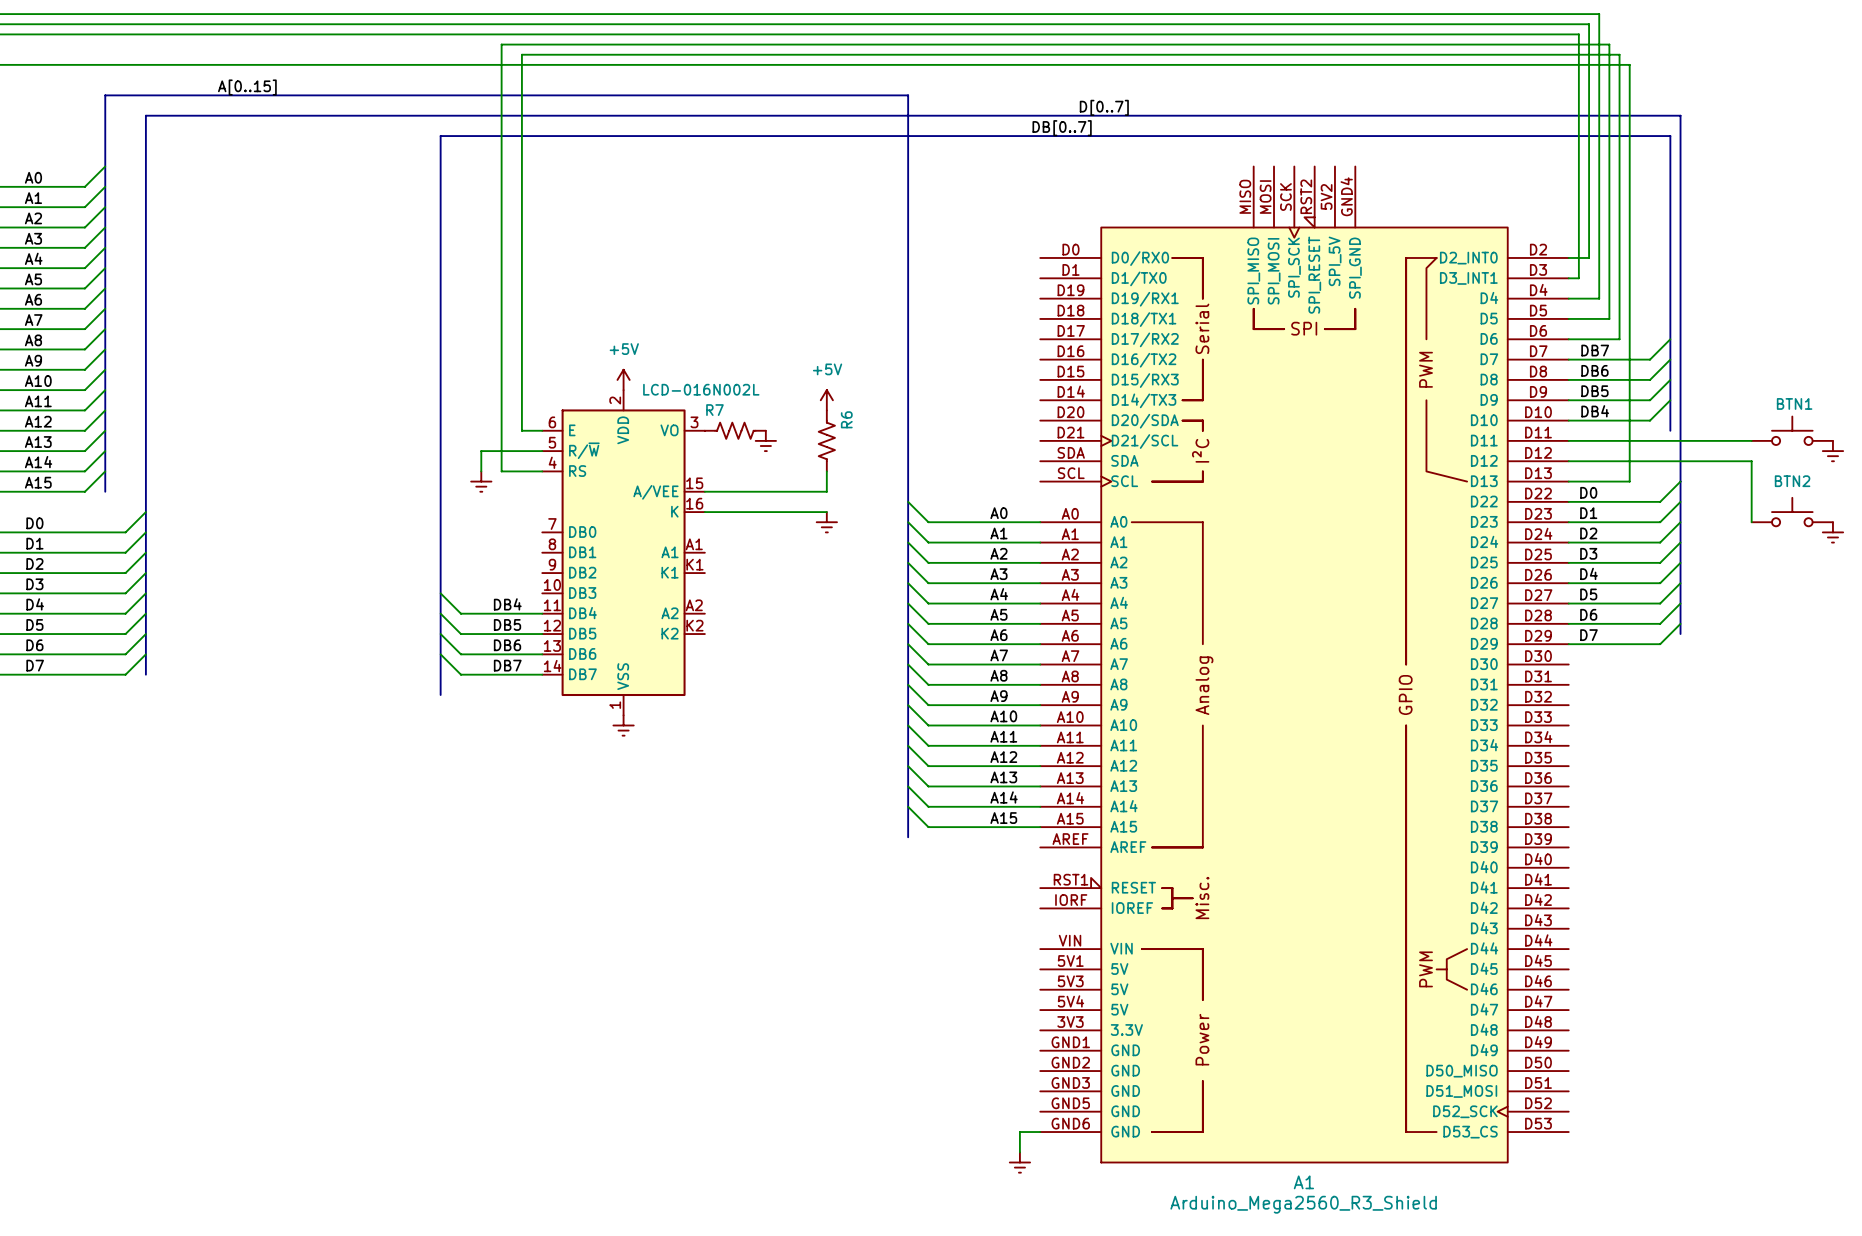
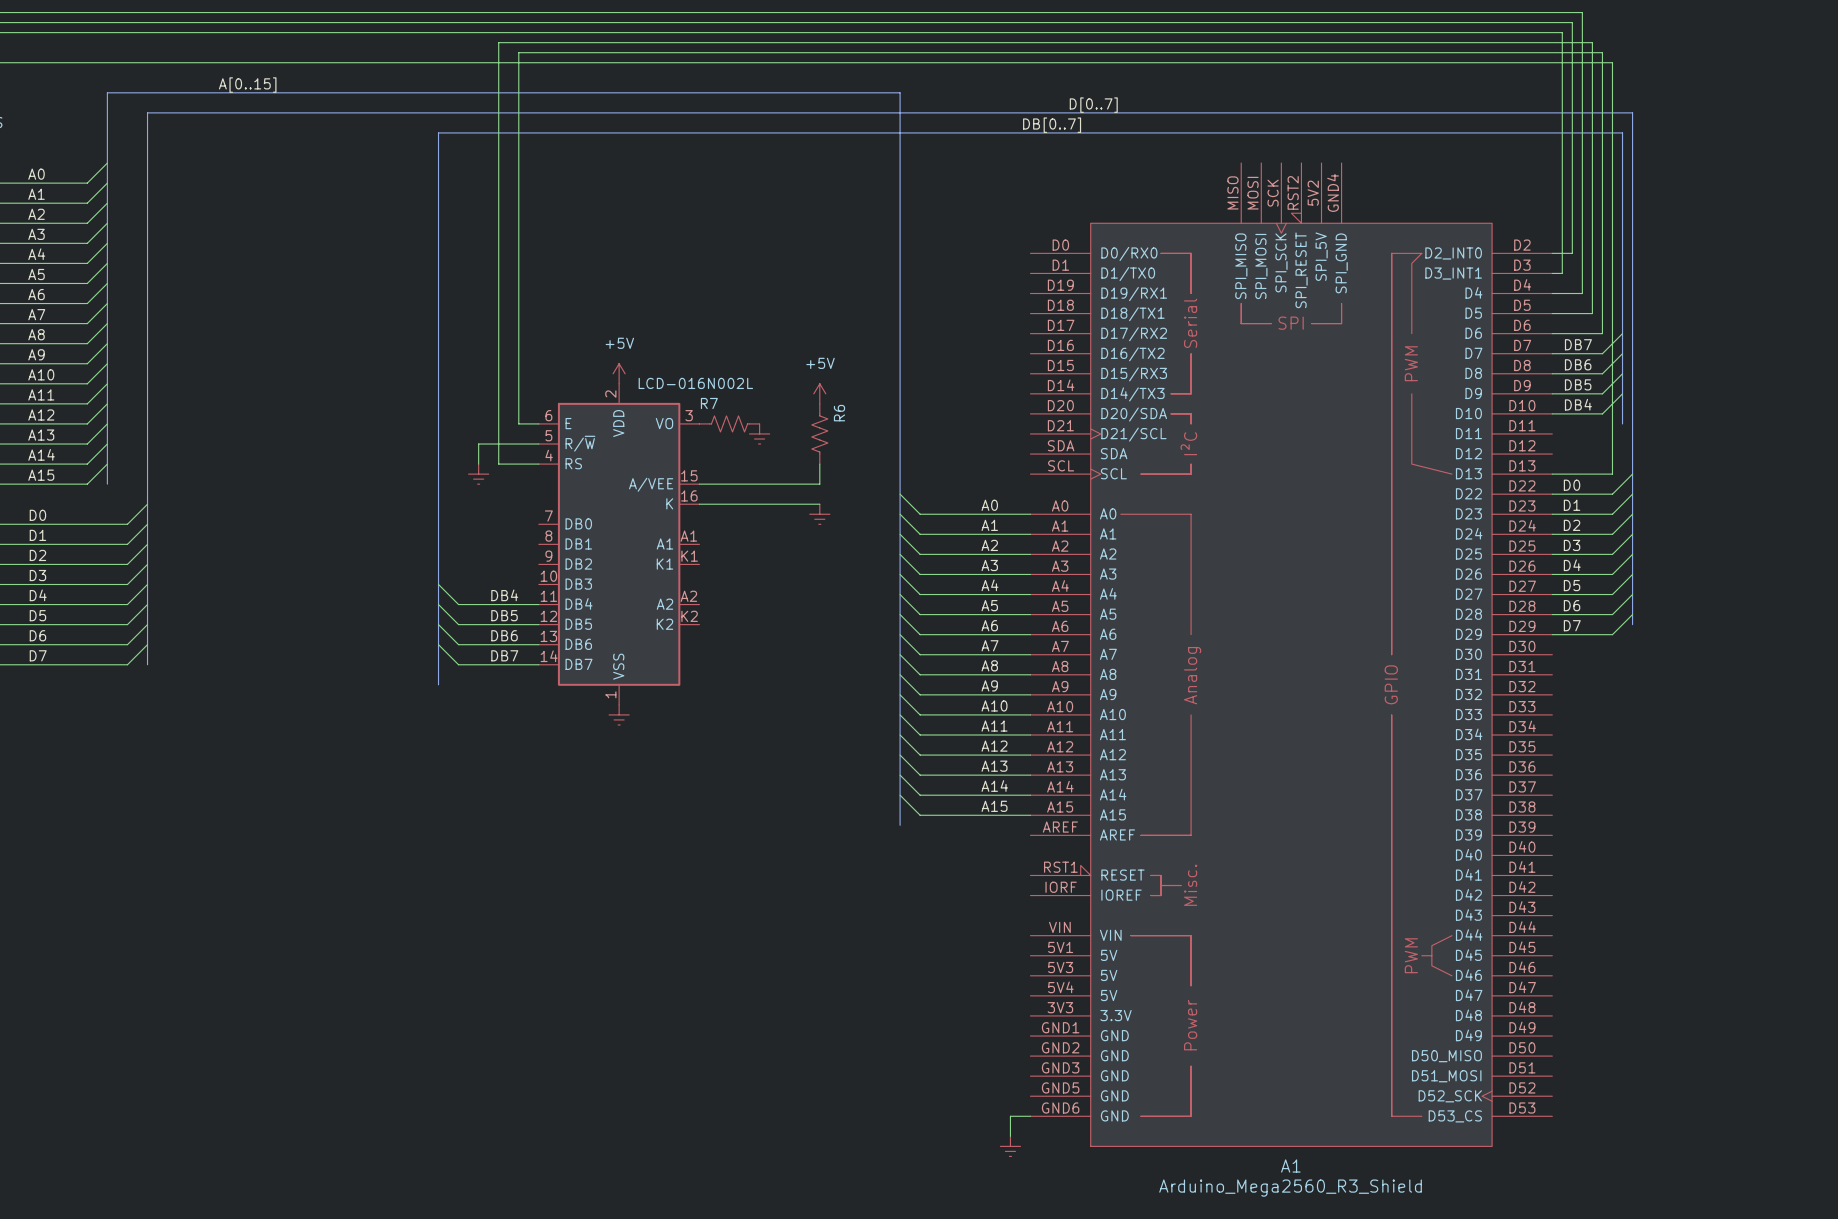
bus: (1650, 115) (1680, 115) (1680, 634) -> (1632, 112) (1632, 624)
bus: (1639, 136) (1670, 136) (1670, 430) -> (1622, 132) (1622, 423)
wire: (1670, 339) (1650, 359) (1619, 359) -> (1622, 333) (1602, 353)
wire: (1670, 359) (1650, 379) (1619, 379) -> (1622, 353) (1602, 373)
wire: (1670, 379) (1650, 400) (1619, 400) -> (1622, 373) (1602, 393)
wire: (1670, 400) (1650, 420) (1619, 420) -> (1622, 393) (1602, 413)
BTN1: (1792, 430) -> none
wire: (1568, 440) (1751, 440) -> none
power symbol: (1832, 451) -> none
wire: (1568, 461) (1751, 461) (1751, 522) -> none
wire: (1680, 481) (1660, 501) (1629, 501) -> (1632, 474) (1612, 494)
wire: (1680, 501) (1660, 522) (1629, 522) -> (1632, 494) (1612, 514)
BTN2: (1792, 512) -> none
wire: (1680, 522) (1660, 542) (1629, 542) -> (1632, 514) (1612, 534)
power symbol: (1832, 532) -> none
wire: (1680, 542) (1660, 562) (1629, 562) -> (1632, 534) (1612, 554)
wire: (1680, 562) (1660, 583) (1629, 583) -> (1632, 554) (1612, 574)
wire: (1680, 583) (1660, 603) (1629, 603) -> (1632, 574) (1612, 594)
wire: (1680, 603) (1660, 623) (1629, 623) -> (1632, 594) (1612, 614)
wire: (1680, 623) (1660, 644) (1629, 644) -> (1632, 614) (1612, 634)

